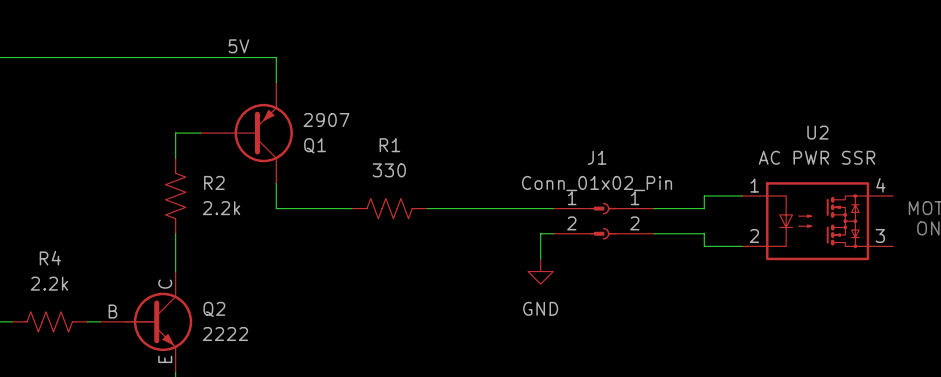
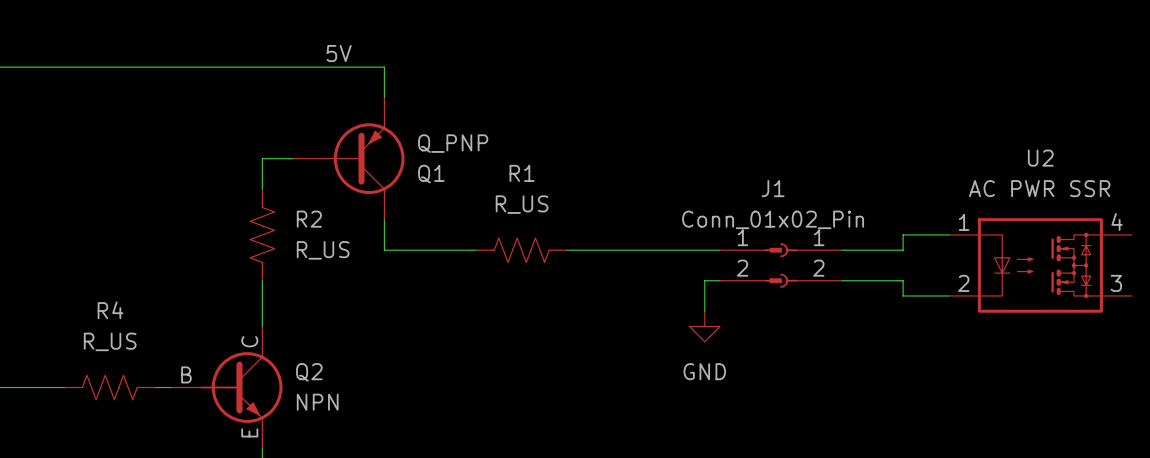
Q1 value: 2907 (326, 120) -> Q_PNP (453, 143)
R1 value: 330 (389, 170) -> R_US (522, 204)
R2 value: 2.2k (221, 208) -> R_US (323, 250)
R4 value: 2.2k (49, 283) -> R_US (110, 341)
Q2 value: 2222 (225, 334) -> NPN (317, 402)

